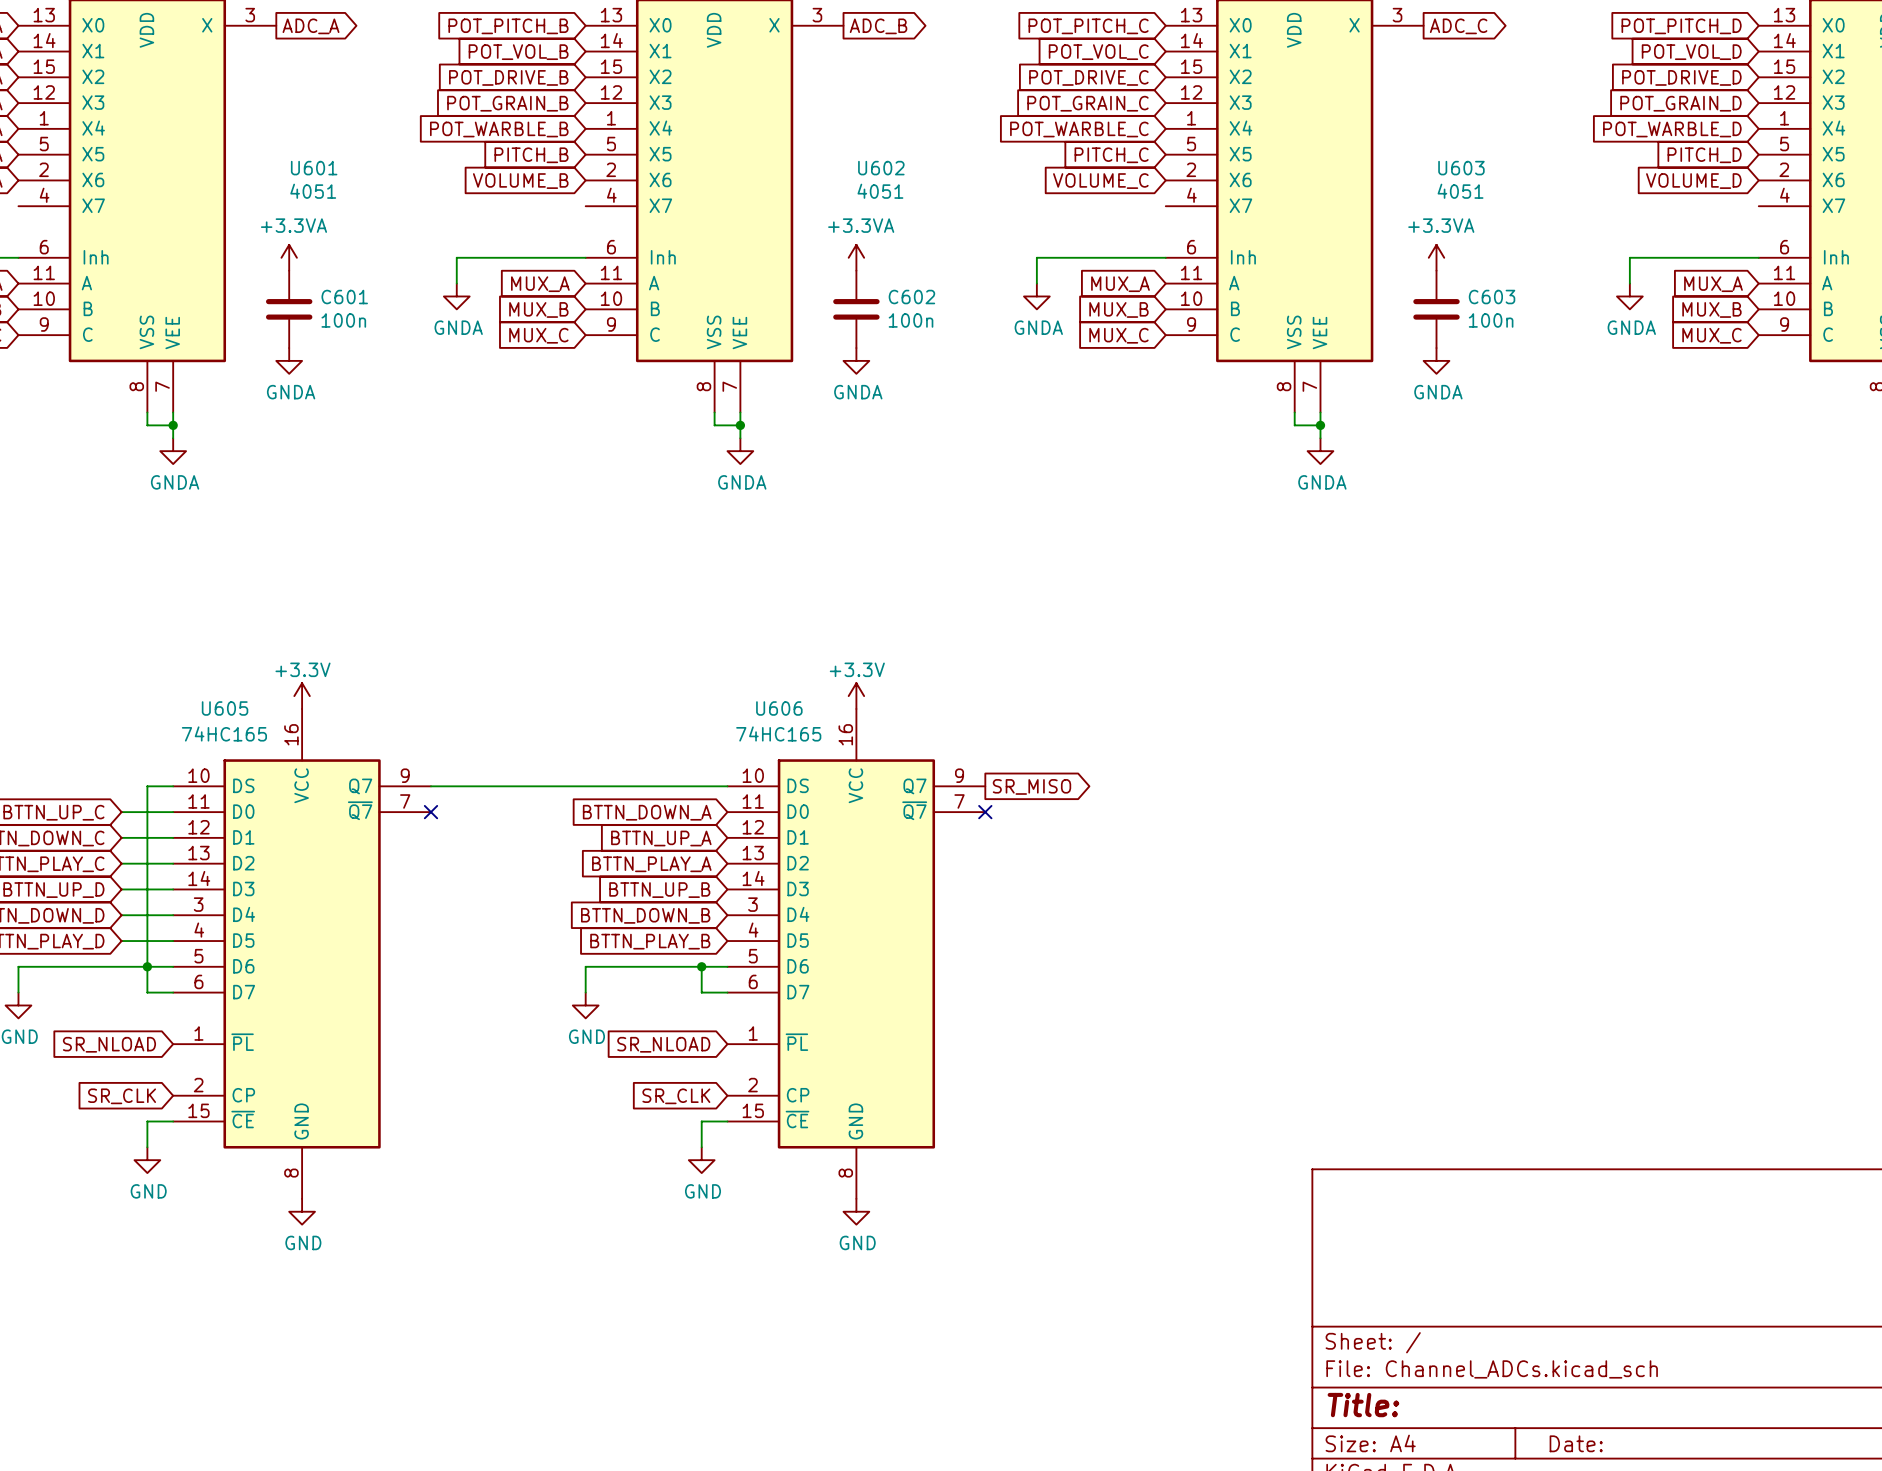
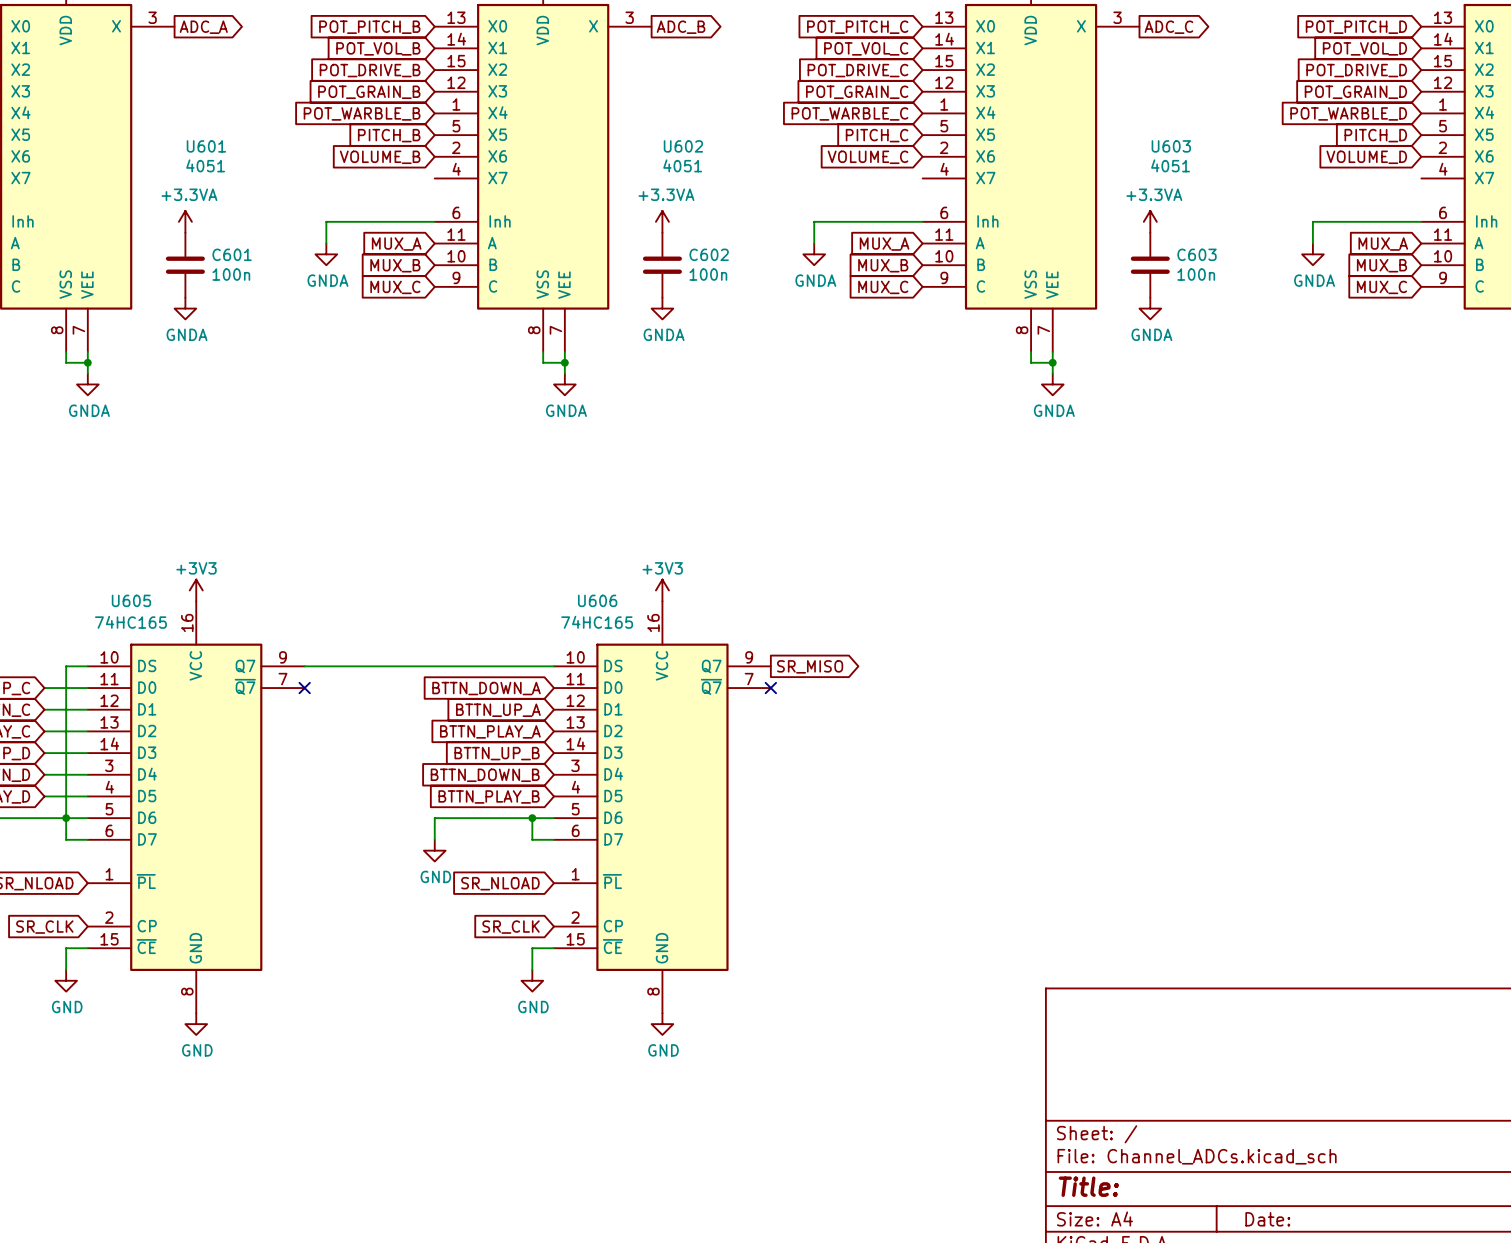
power symbol: +3.3V (302, 696) -> +3V3 (196, 590)
power symbol: +3.3V (856, 696) -> +3V3 (662, 590)

